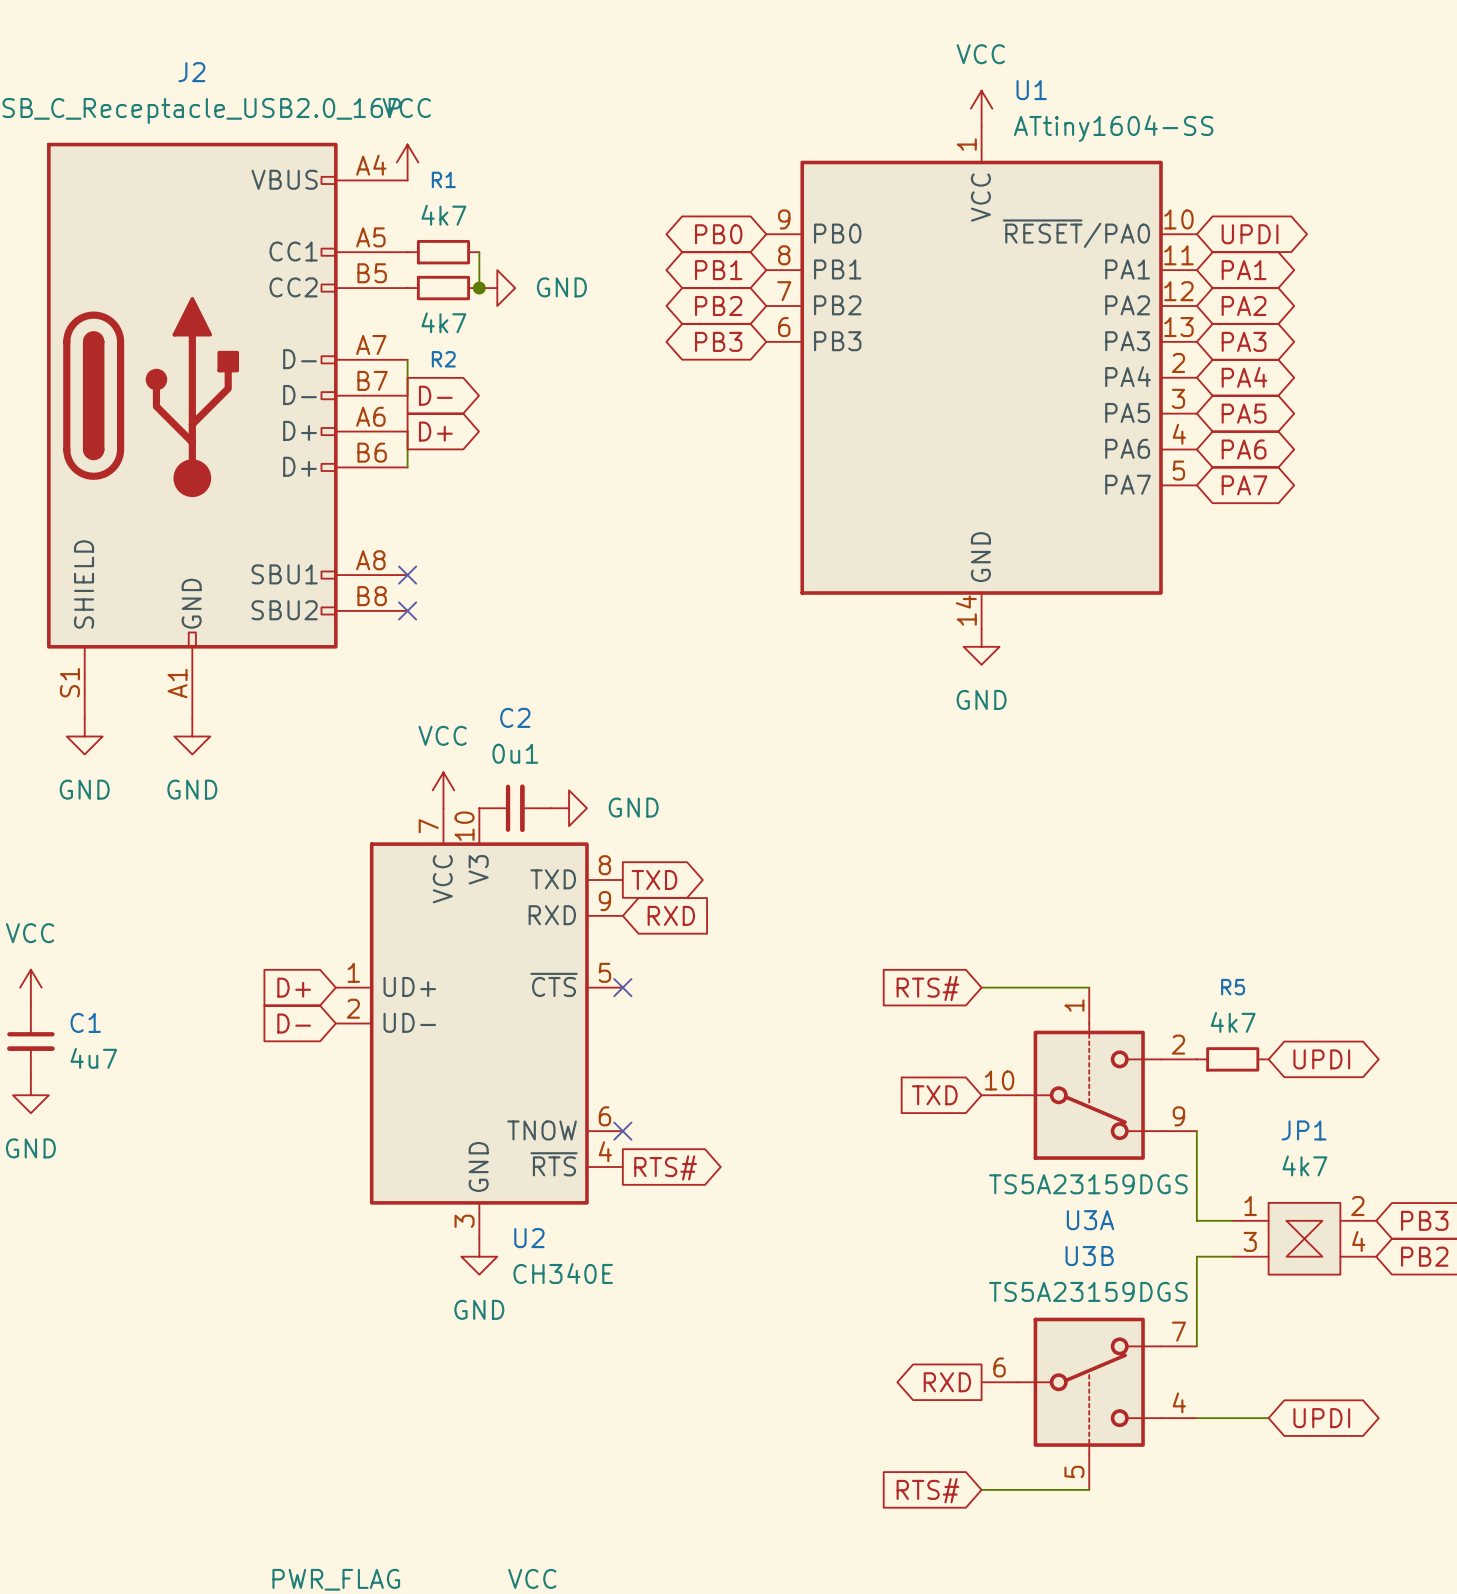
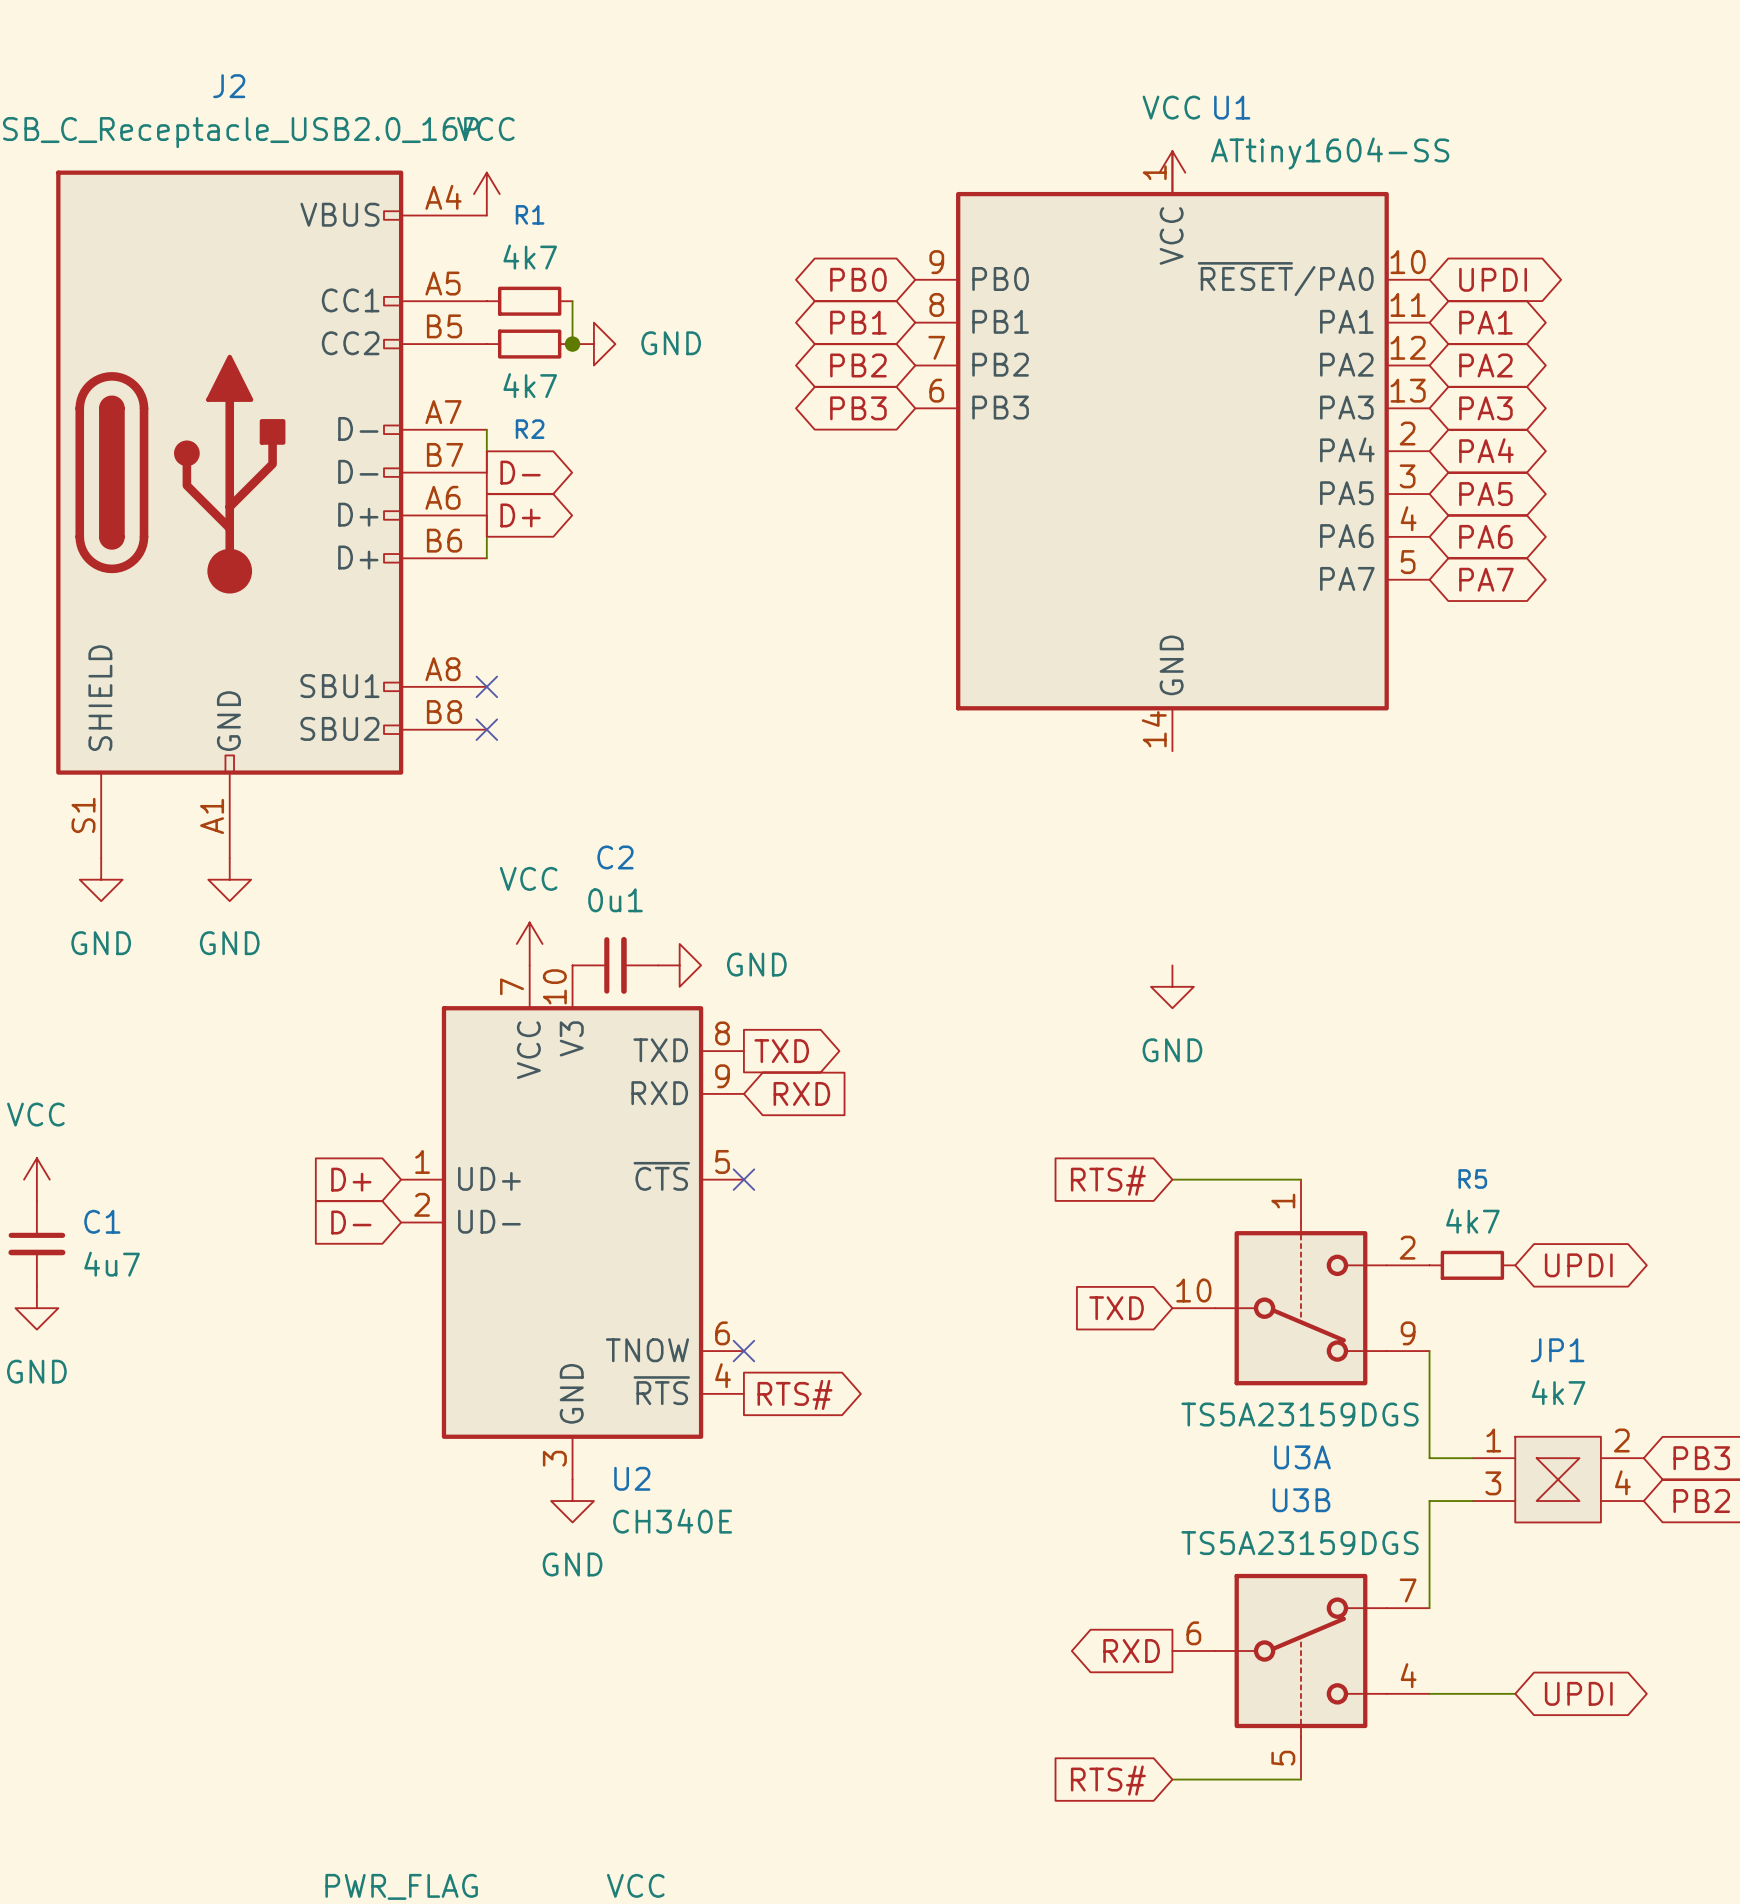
power symbol position: VCC (981, 108) -> VCC (1172, 172)
power symbol position: GND (981, 646) -> GND (1172, 986)

